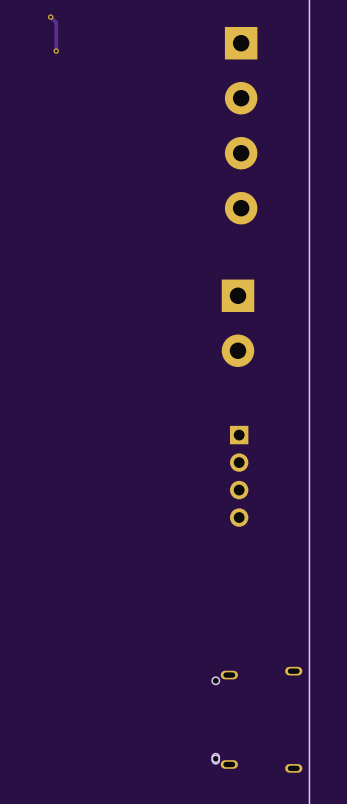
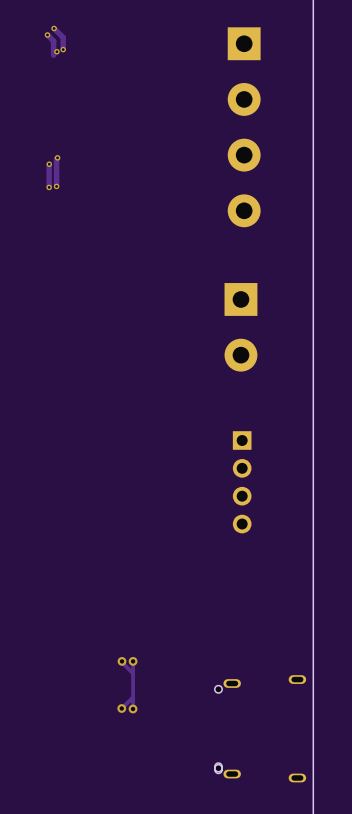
track: (50, 17) (56, 22) (56, 51) -> none
via: (50, 17) -> none
track: none -> (54, 28) (63, 37) (63, 49)
via: none -> (54, 28)
track: none -> (47, 34) (53, 41) (53, 55)
via: none -> (47, 34)
via: none -> (63, 49)
track: none -> (57, 157) (56, 186)
via: none -> (57, 157)
track: none -> (49, 164) (49, 187)
via: none -> (49, 164)
via: none -> (56, 186)
via: none -> (49, 187)
track: none -> (122, 661) (133, 673)
via: none -> (122, 661)
track: none -> (133, 661) (133, 708)
via: none -> (133, 661)
track: none -> (133, 697) (121, 708)
via: none -> (121, 708)
via: none -> (133, 709)

